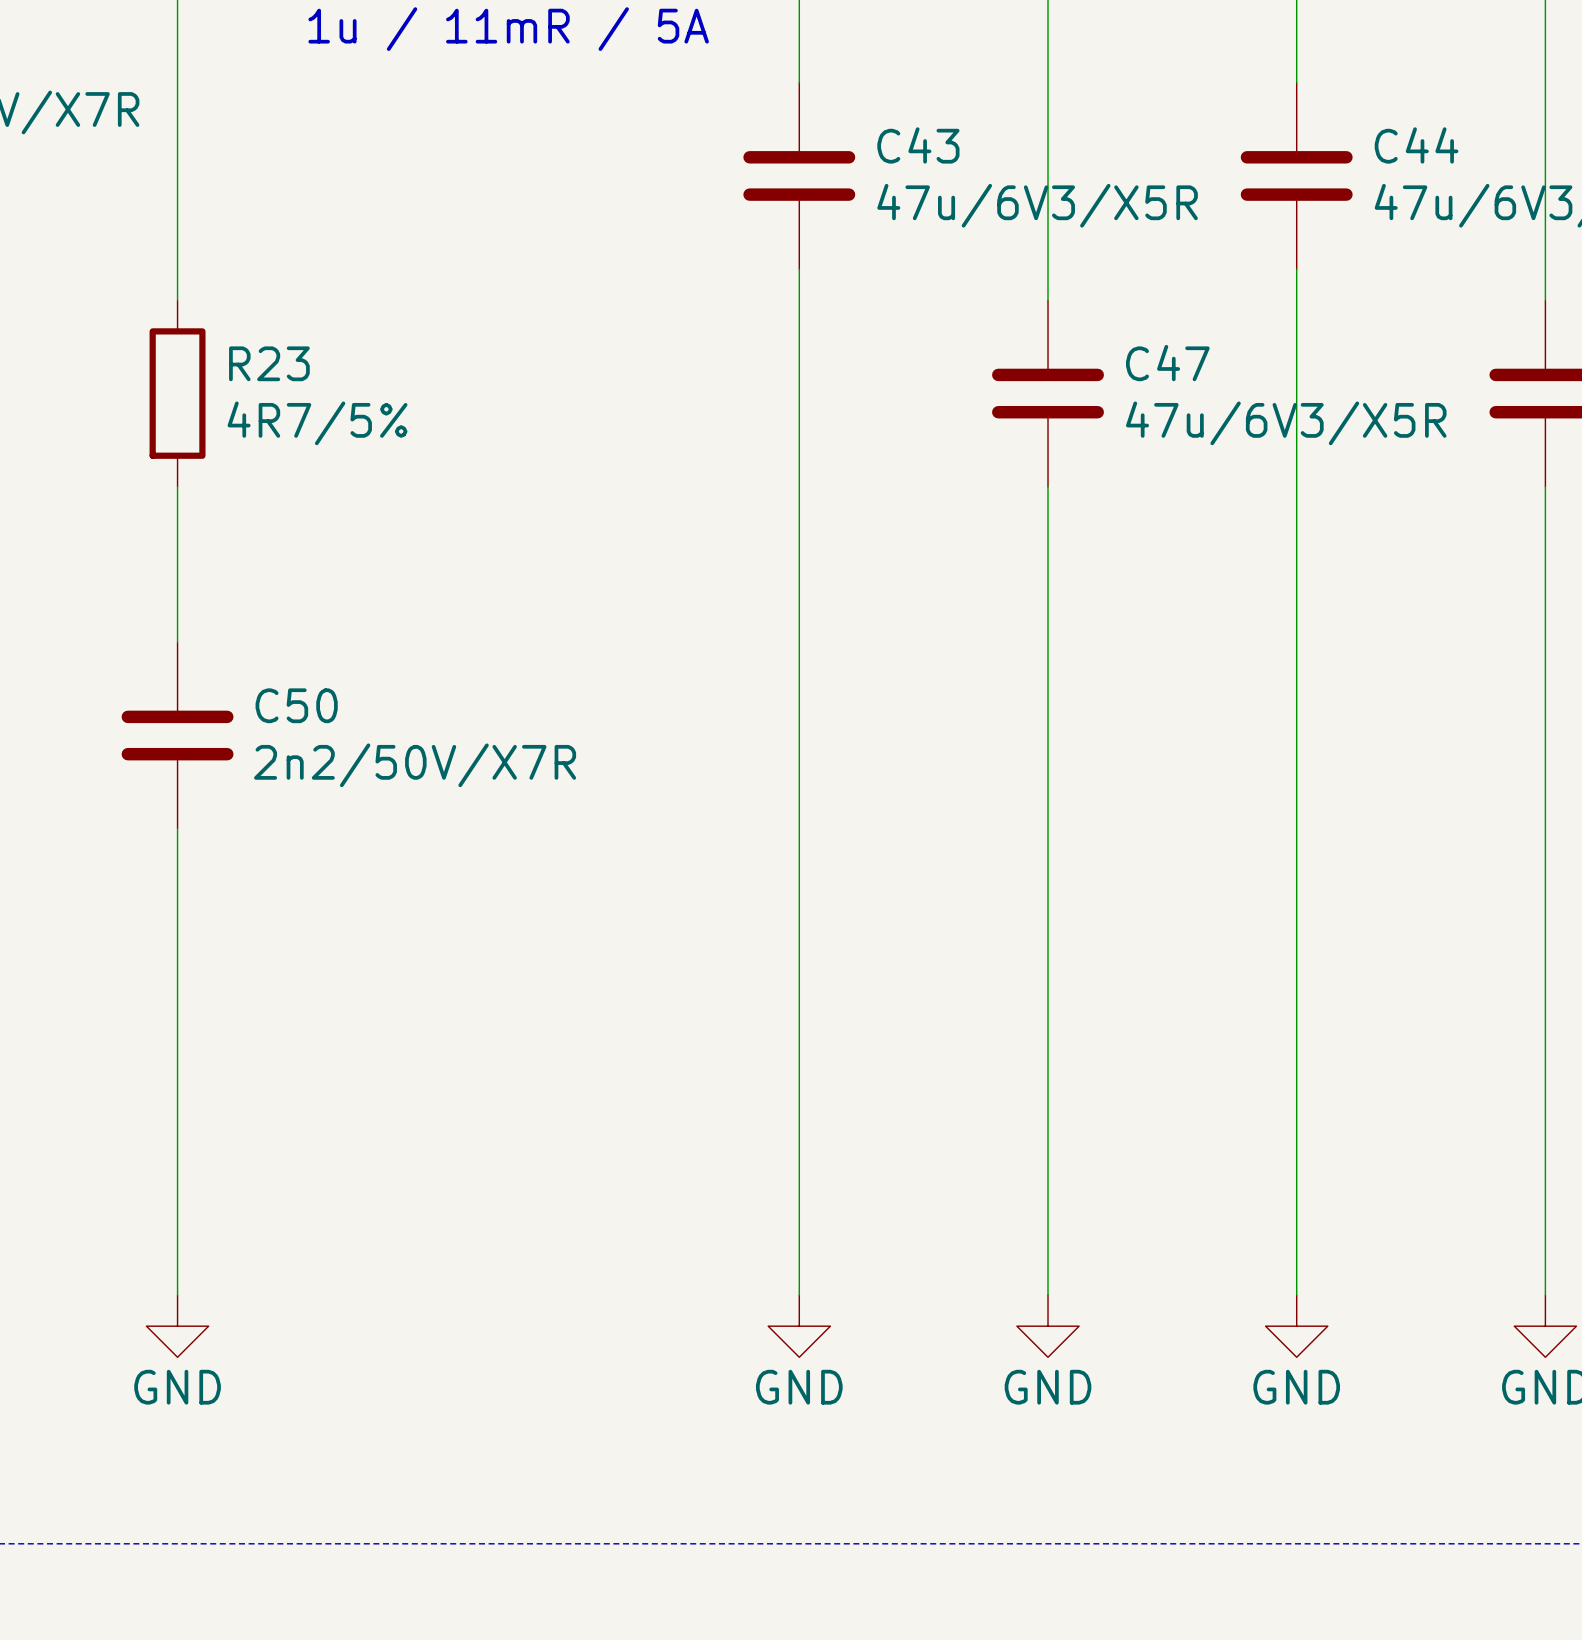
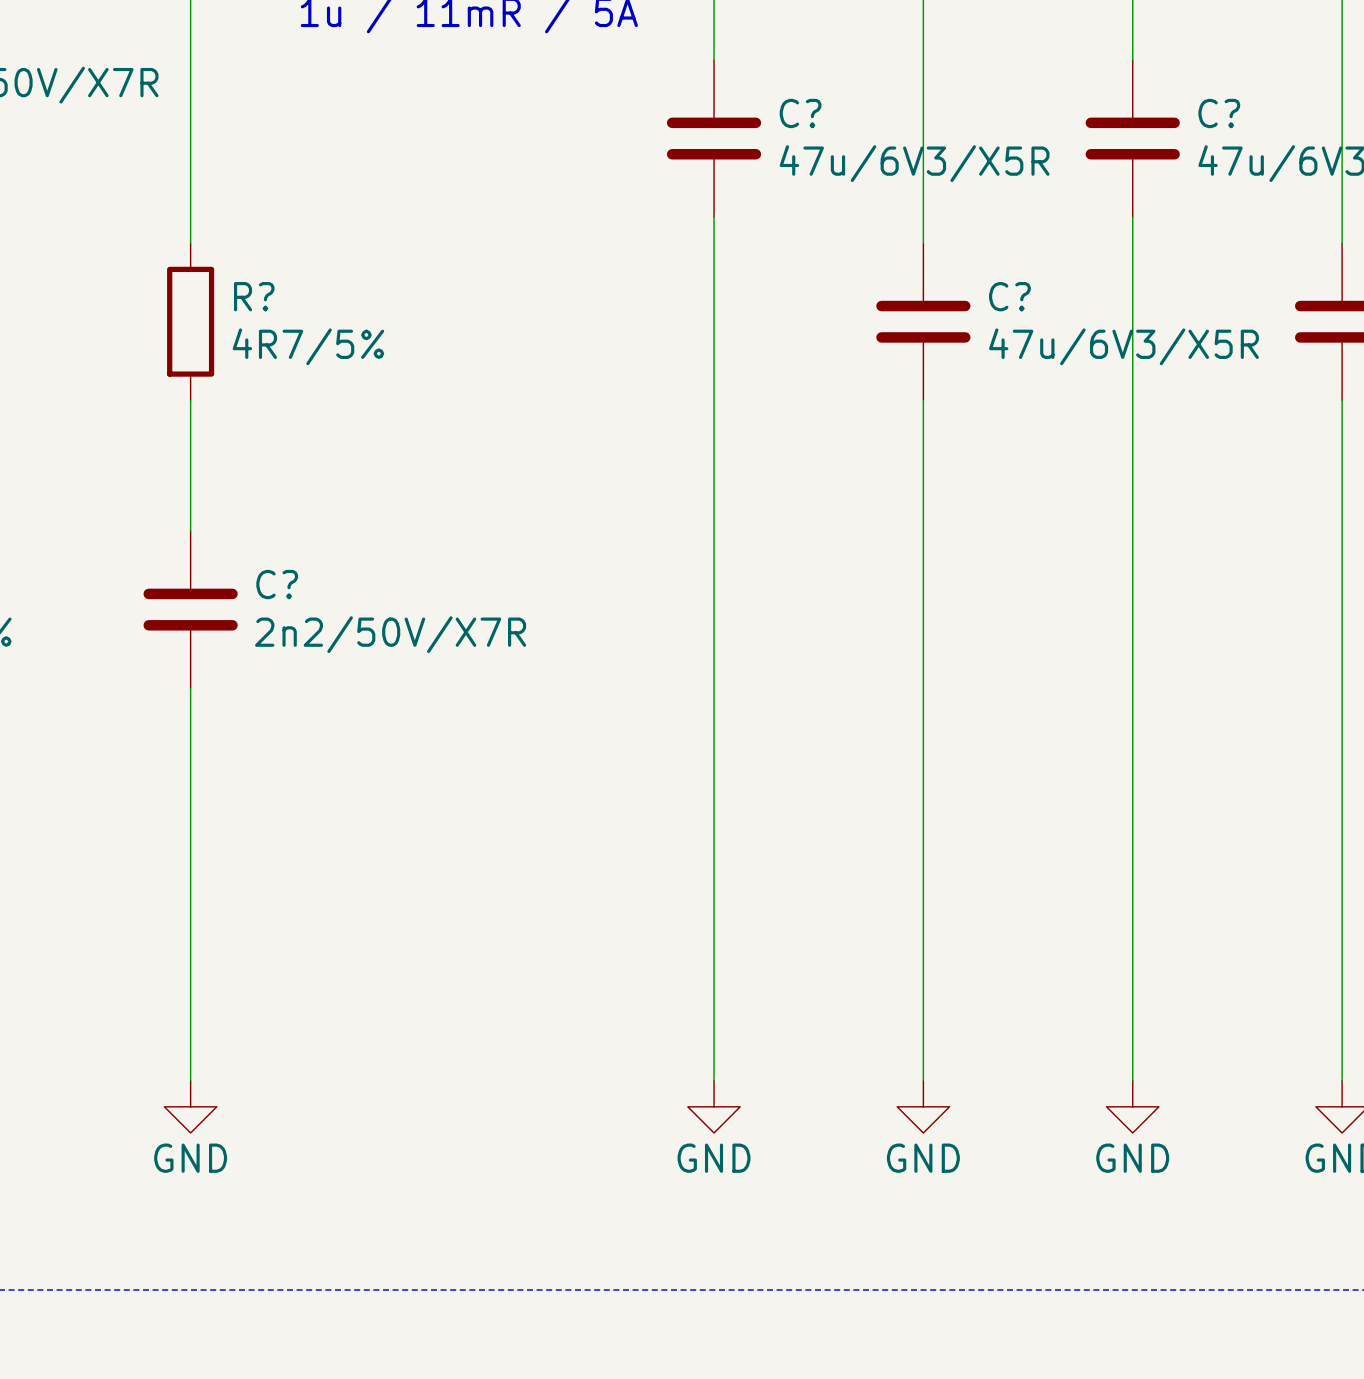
C43 name: C43 (918, 145) -> C? (800, 113)
C44 name: C44 (1416, 145) -> C? (1219, 113)
R23 name: R23 (269, 363) -> R? (254, 296)
C47 name: C47 (1167, 363) -> C? (1009, 296)
C50 name: C50 (296, 705) -> C? (277, 584)

